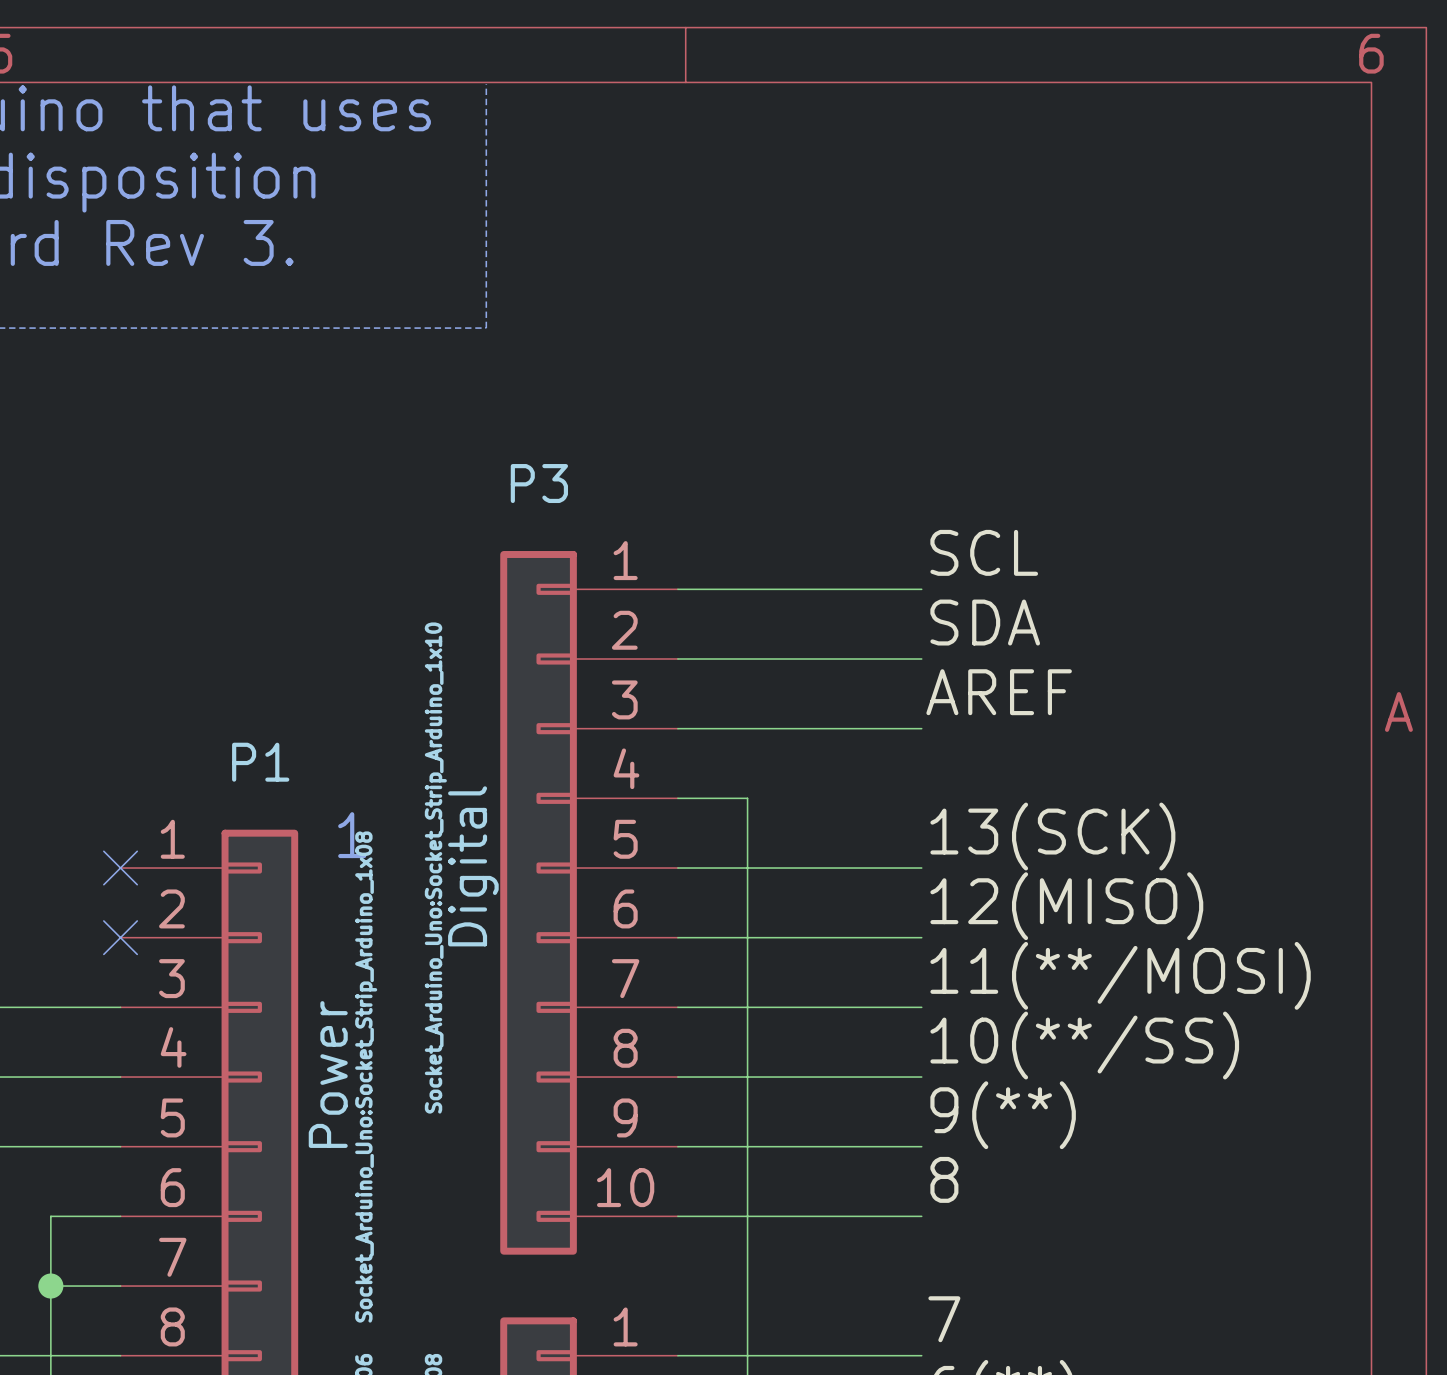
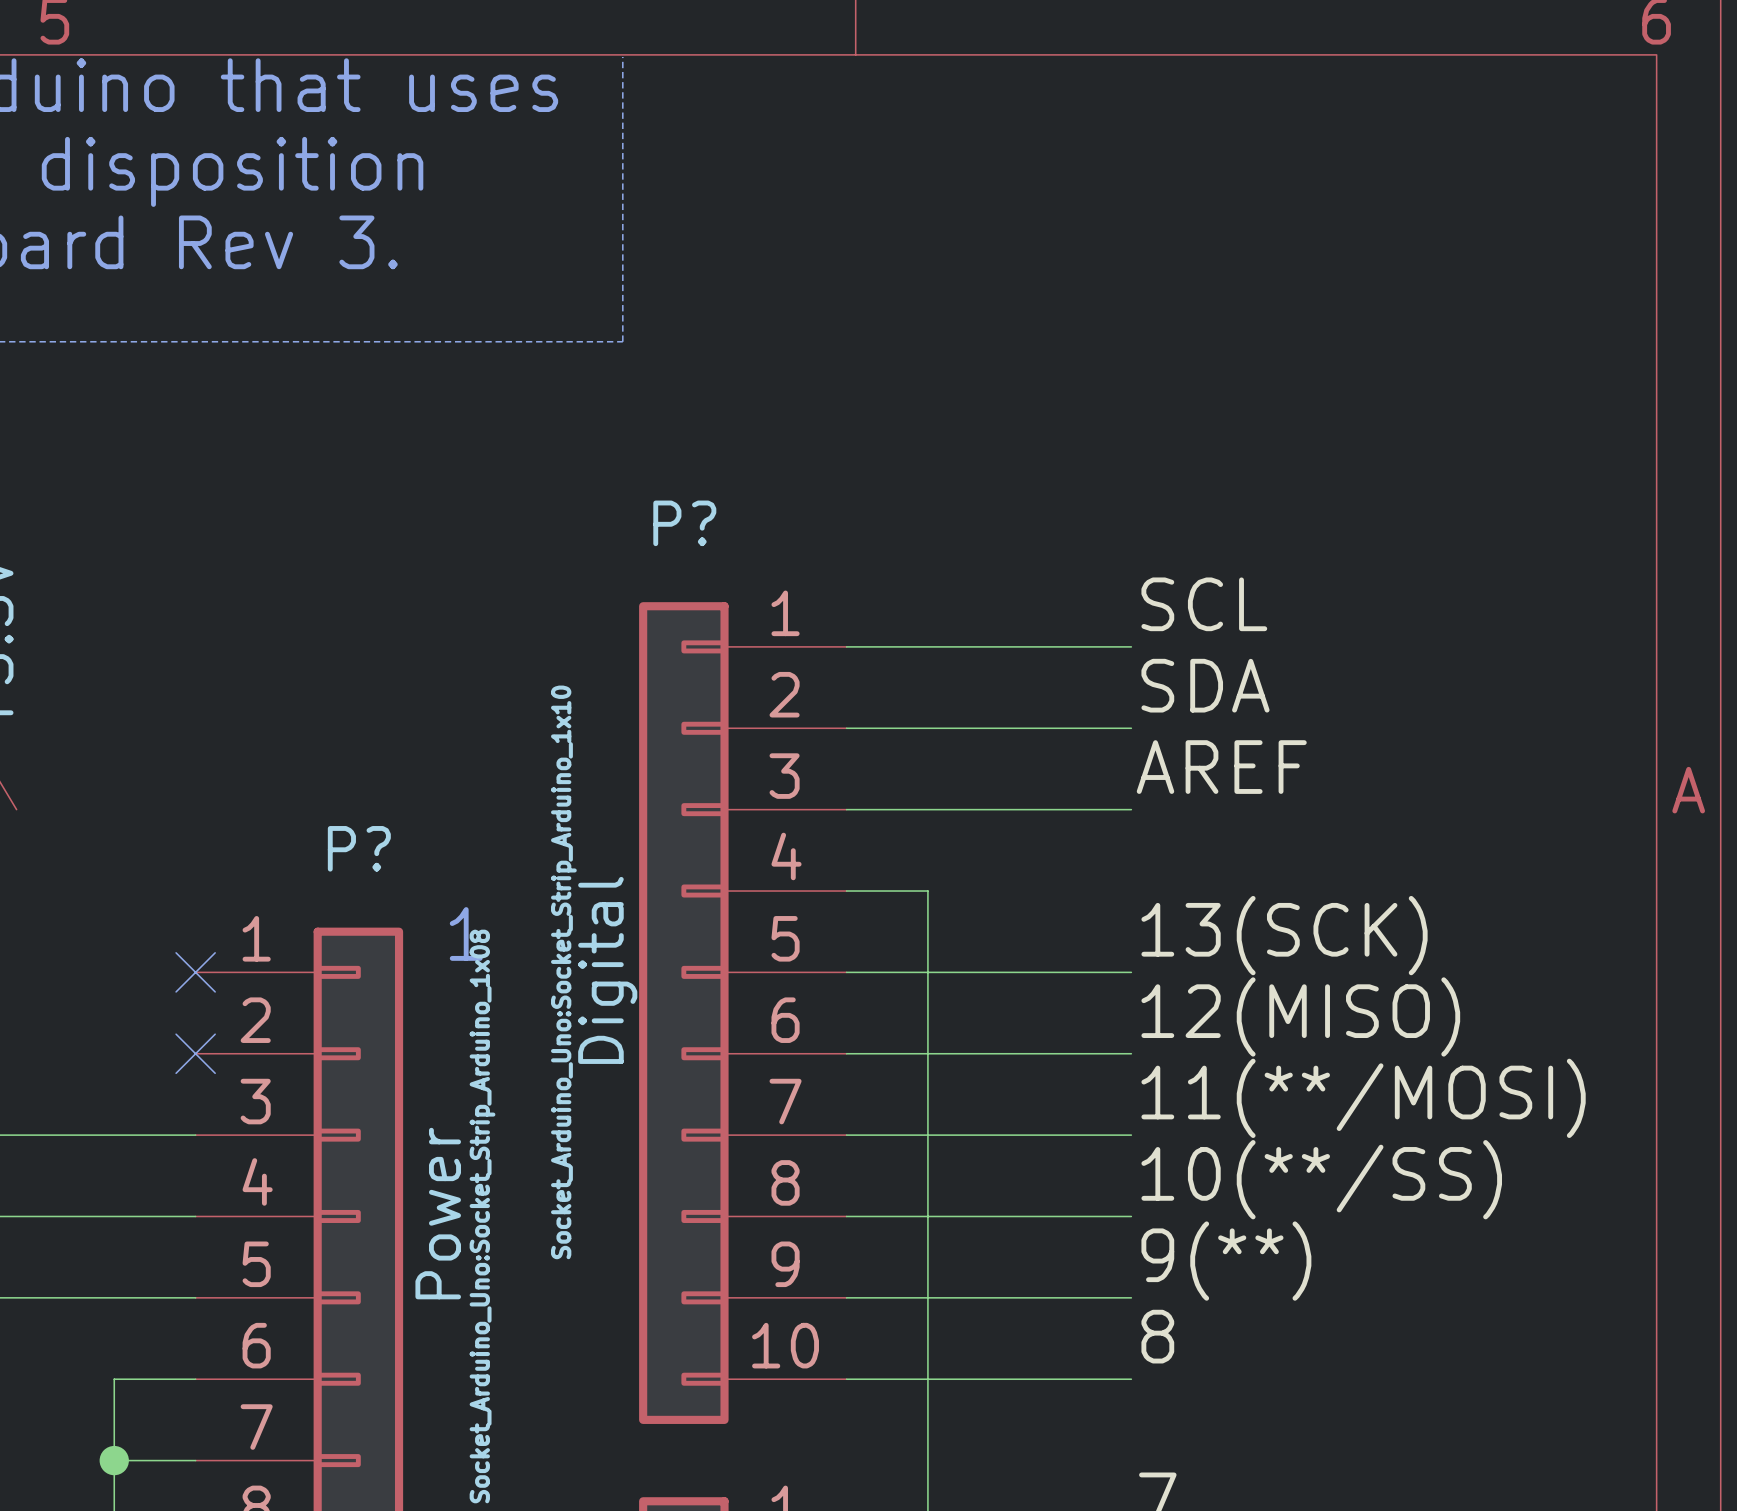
P3 name: P3 (539, 483) -> P? (684, 523)
P1 name: P1 (260, 762) -> P? (359, 848)

